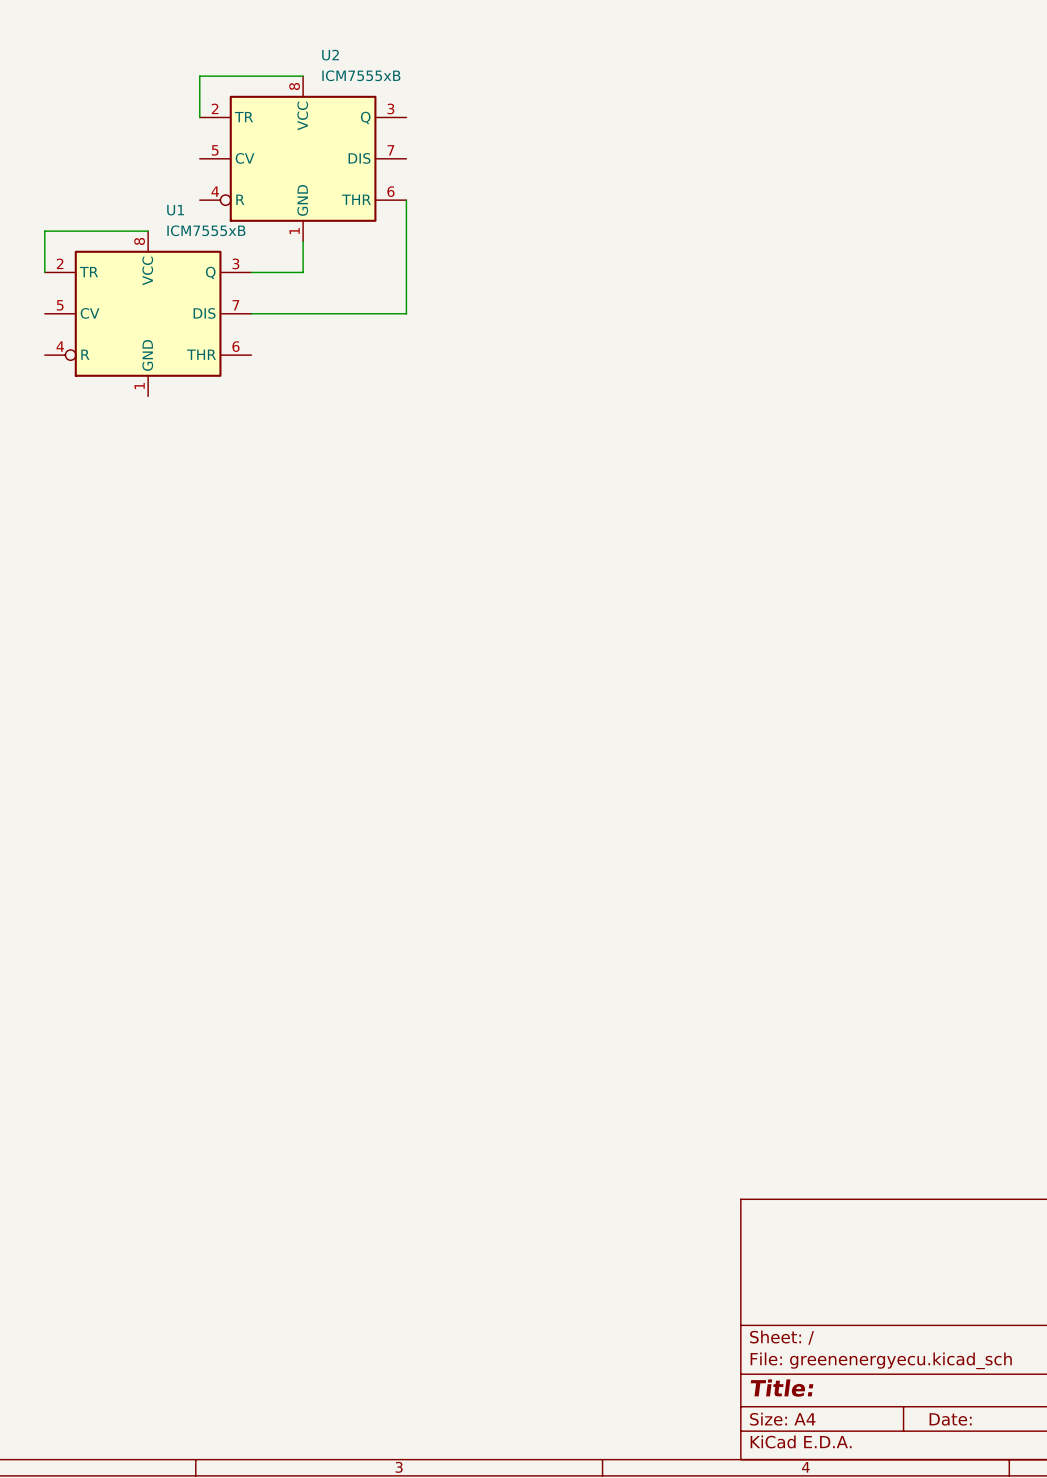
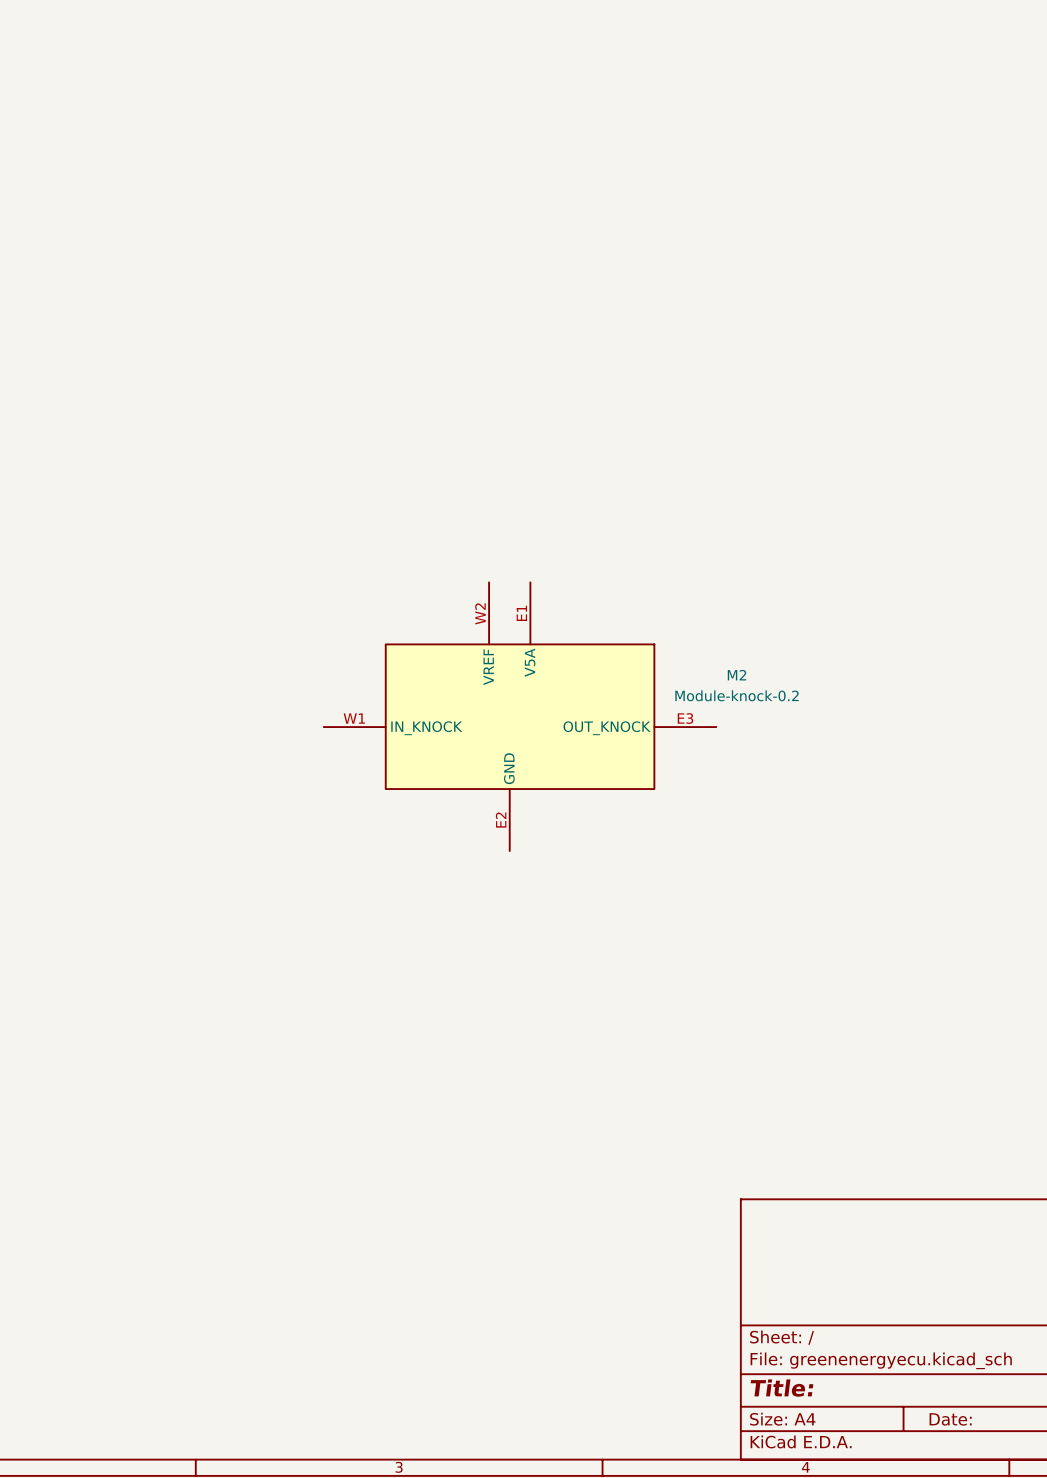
wire: (303, 76) (199, 76) (199, 117) -> none
U2: ICM7555xB (303, 158) -> none
wire: (406, 200) (406, 313) (251, 313) -> none
wire: (148, 231) (44, 231) (44, 272) -> none
wire: (303, 241) (303, 272) (251, 272) -> none
U1: ICM7555xB (148, 313) -> none
M2: none -> Module-knock-0.2 (520, 716)

